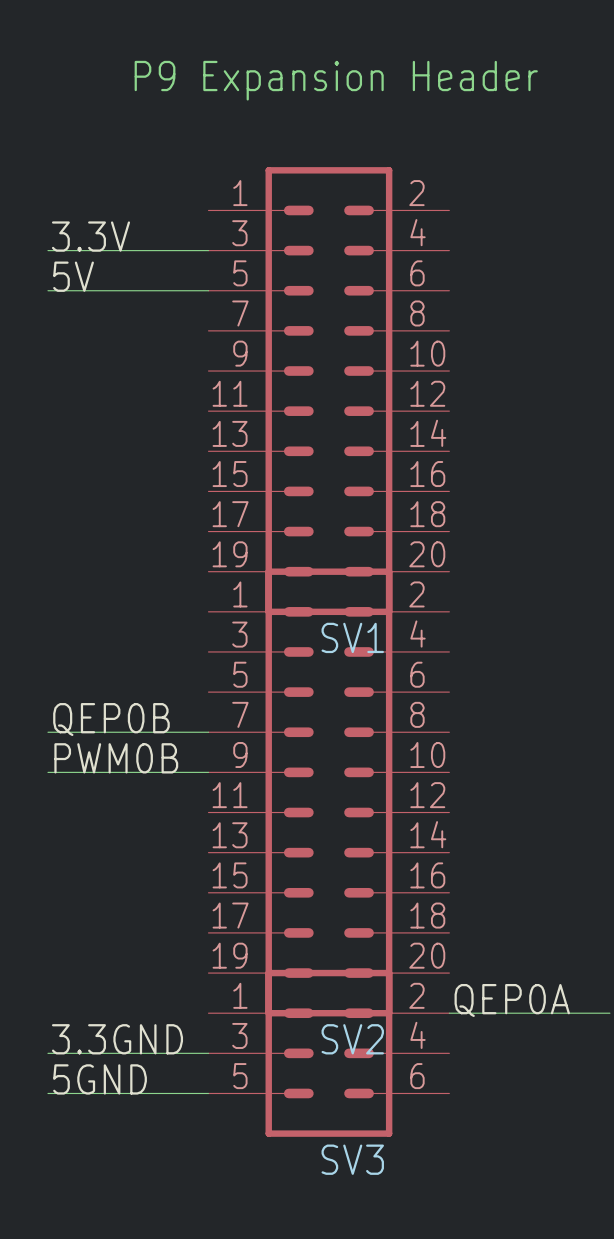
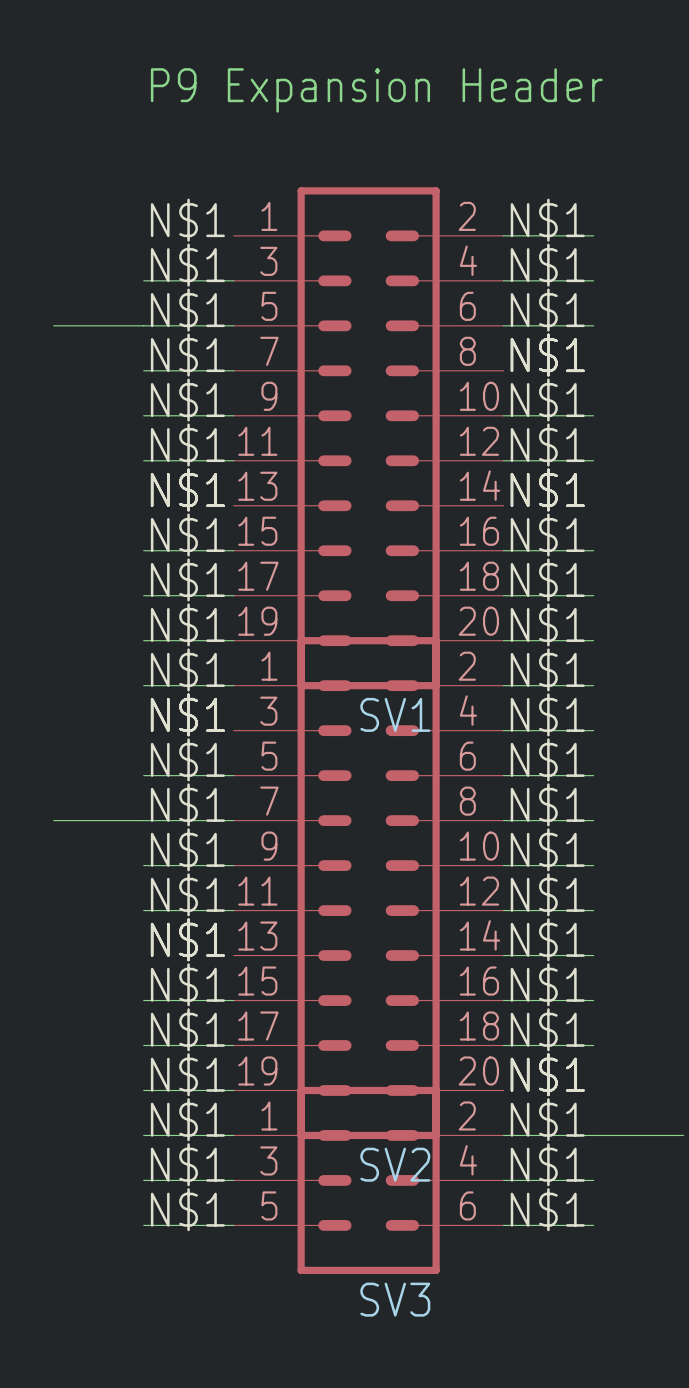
label: none -> N$1 (187, 220)
label: none -> N$1 (547, 220)
wire: none -> (503, 235) (593, 235)
label: 3.3V (91, 236) -> none
label: none -> N$1 (187, 265)
label: none -> N$1 (547, 265)
wire: (47, 250) (128, 250) -> (143, 415) (233, 415)
wire: none -> (503, 280) (593, 280)
label: 5V (73, 276) -> none
label: none -> N$1 (187, 310)
label: none -> N$1 (547, 310)
wire: none -> (503, 325) (593, 325)
label: none -> N$1 (187, 355)
label: none -> N$1 (547, 355)
wire: none -> (143, 370) (233, 370)
label: none -> N$1 (187, 400)
label: none -> N$1 (547, 400)
wire: none -> (503, 415) (593, 415)
label: none -> N$1 (187, 445)
label: none -> N$1 (547, 445)
wire: none -> (143, 460) (233, 460)
wire: none -> (503, 460) (593, 460)
label: none -> N$1 (187, 490)
label: none -> N$1 (547, 490)
label: none -> N$1 (187, 534)
label: none -> N$1 (547, 534)
wire: none -> (143, 550) (233, 550)
wire: none -> (503, 550) (593, 550)
label: none -> N$1 (187, 579)
label: none -> N$1 (547, 579)
wire: none -> (143, 595) (233, 595)
wire: none -> (503, 595) (593, 595)
label: none -> N$1 (187, 624)
label: none -> N$1 (547, 624)
wire: none -> (143, 640) (233, 640)
wire: none -> (503, 640) (593, 640)
label: none -> N$1 (187, 669)
label: none -> N$1 (547, 669)
wire: none -> (143, 685) (233, 685)
wire: none -> (503, 685) (593, 685)
label: none -> N$1 (187, 714)
label: none -> N$1 (547, 714)
wire: none -> (503, 730) (593, 730)
label: none -> N$1 (187, 759)
label: none -> N$1 (547, 759)
wire: none -> (503, 775) (593, 775)
label: none -> N$1 (187, 804)
label: none -> N$1 (547, 804)
label: QEP0B (111, 719) -> none
wire: none -> (503, 820) (593, 820)
label: PWM0B (116, 758) -> none
label: none -> N$1 (187, 849)
label: none -> N$1 (547, 849)
wire: (47, 772) (128, 772) -> (143, 775) (233, 775)
wire: none -> (503, 865) (593, 865)
label: none -> N$1 (187, 894)
label: none -> N$1 (547, 894)
wire: none -> (143, 910) (233, 910)
wire: none -> (503, 910) (593, 910)
label: none -> N$1 (187, 939)
label: none -> N$1 (547, 939)
wire: none -> (503, 955) (593, 955)
label: none -> N$1 (187, 984)
label: none -> N$1 (547, 984)
wire: none -> (143, 1000) (233, 1000)
wire: none -> (503, 1000) (593, 1000)
label: none -> N$1 (187, 1029)
label: none -> N$1 (547, 1029)
wire: none -> (143, 1045) (233, 1045)
wire: none -> (503, 1045) (593, 1045)
label: none -> N$1 (187, 1074)
label: none -> N$1 (547, 1074)
label: none -> N$1 (187, 1119)
label: QEP0A (512, 1000) -> N$1 (547, 1119)
label: 3.3GND (117, 1039) -> none
label: none -> N$1 (187, 1164)
label: none -> N$1 (547, 1164)
wire: (47, 1053) (128, 1053) -> (143, 1090) (233, 1090)
wire: none -> (503, 1180) (593, 1180)
label: 5GND (100, 1079) -> none
label: none -> N$1 (187, 1209)
label: none -> N$1 (547, 1209)
wire: (47, 1093) (128, 1093) -> (143, 1135) (233, 1135)
wire: none -> (503, 1225) (593, 1225)

